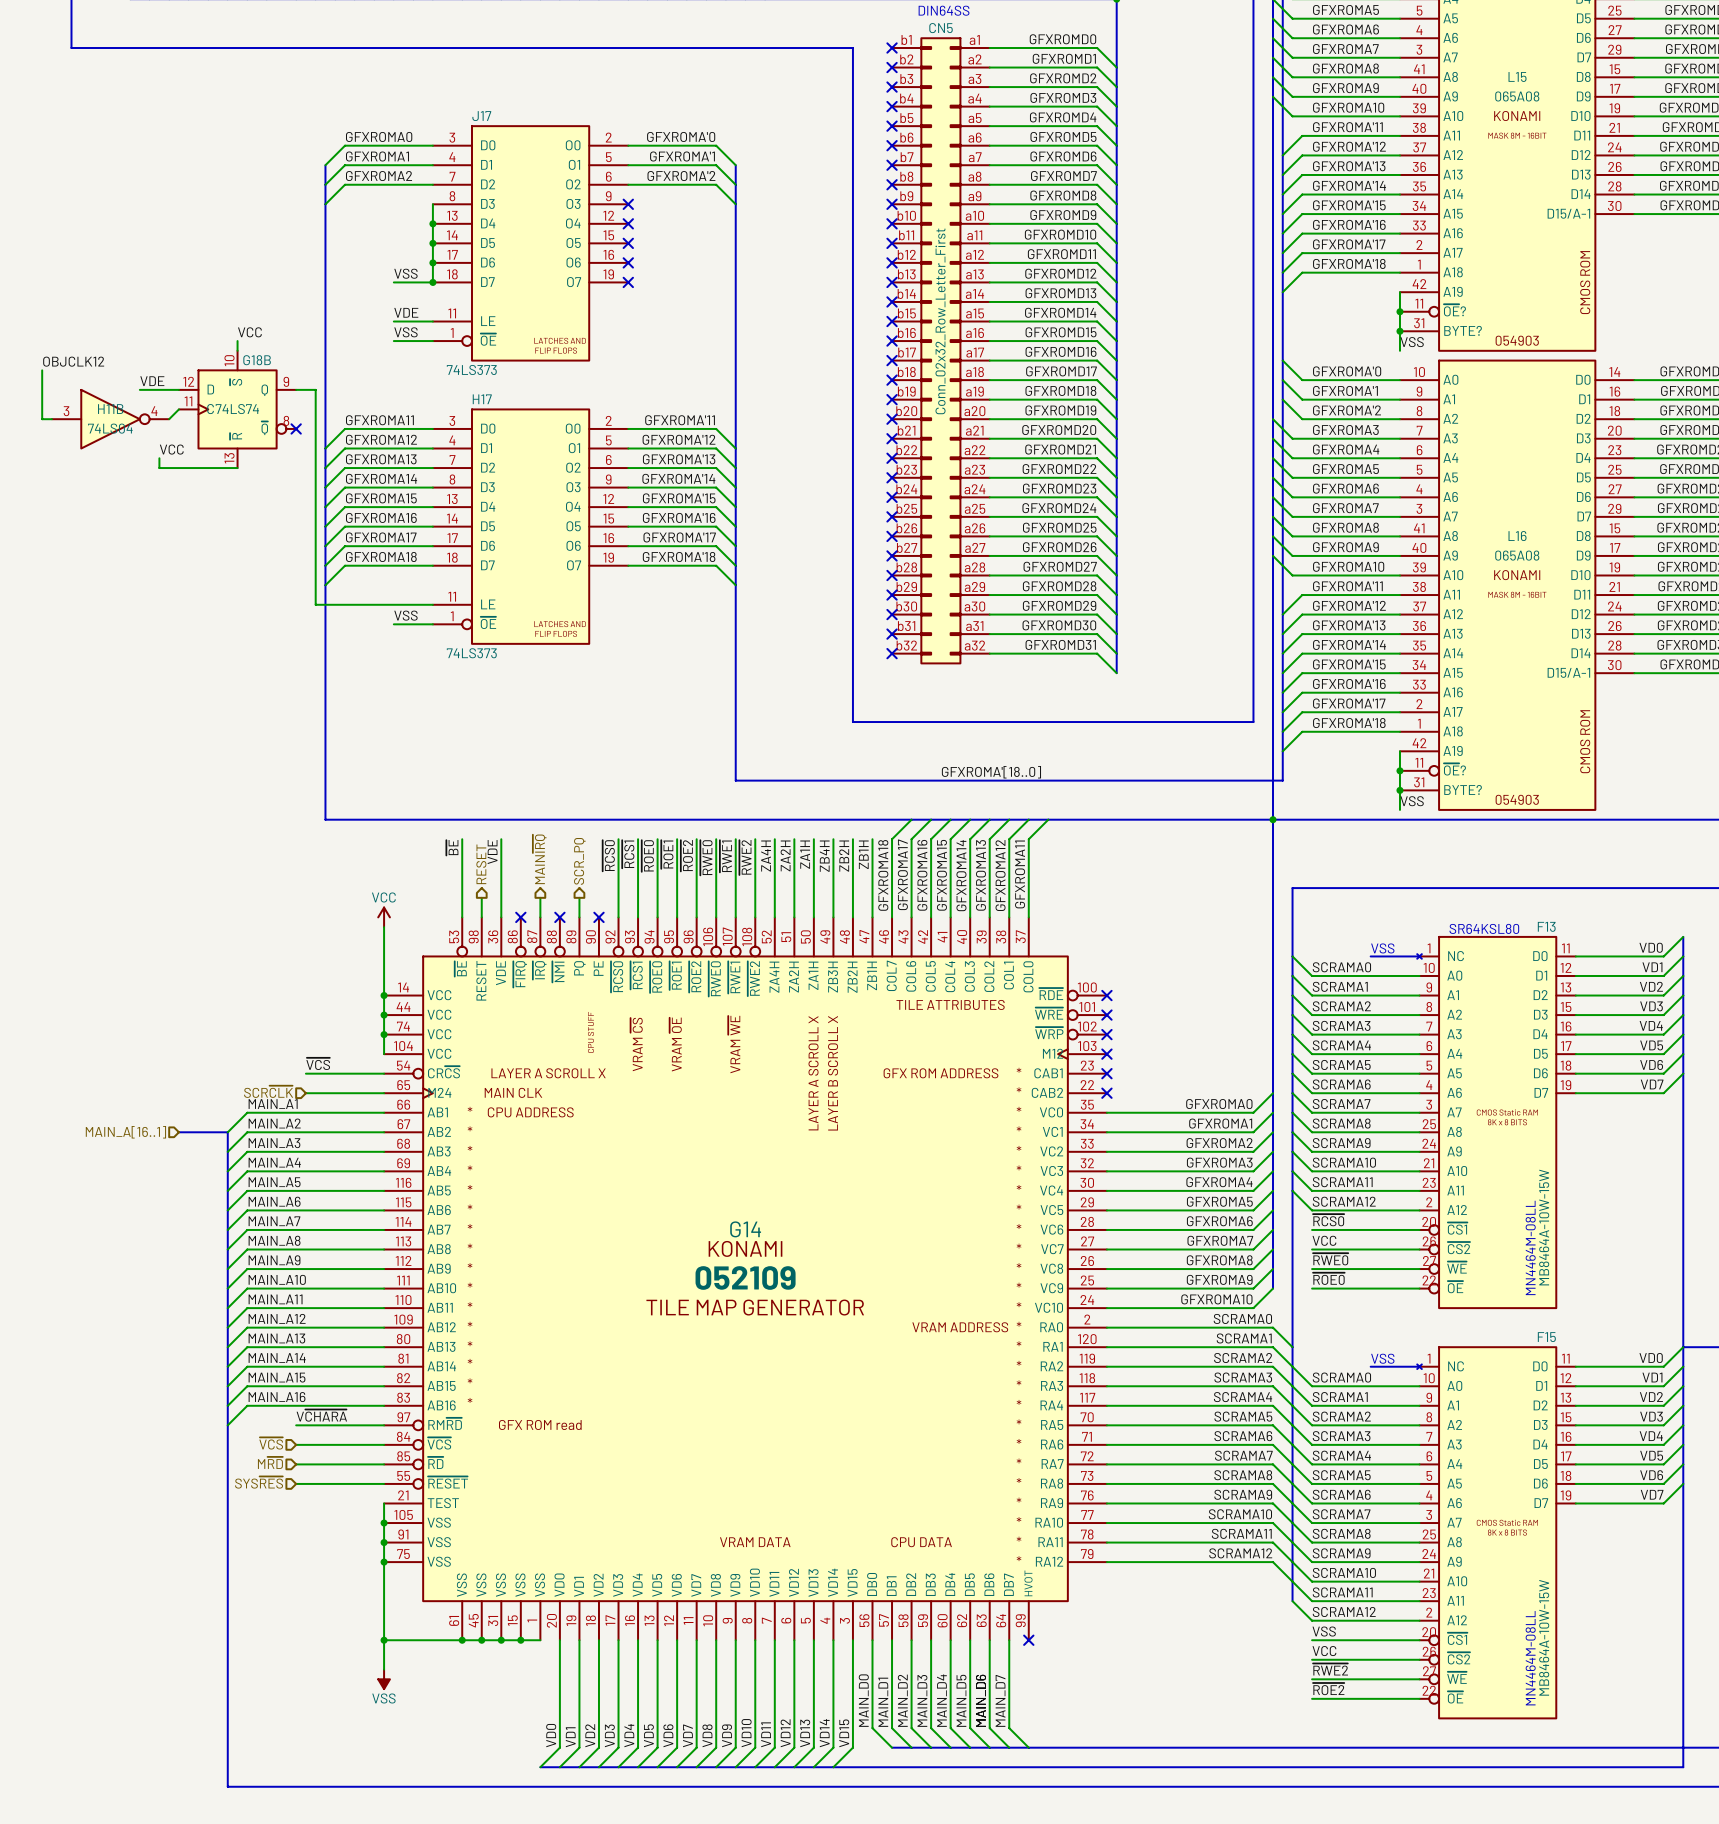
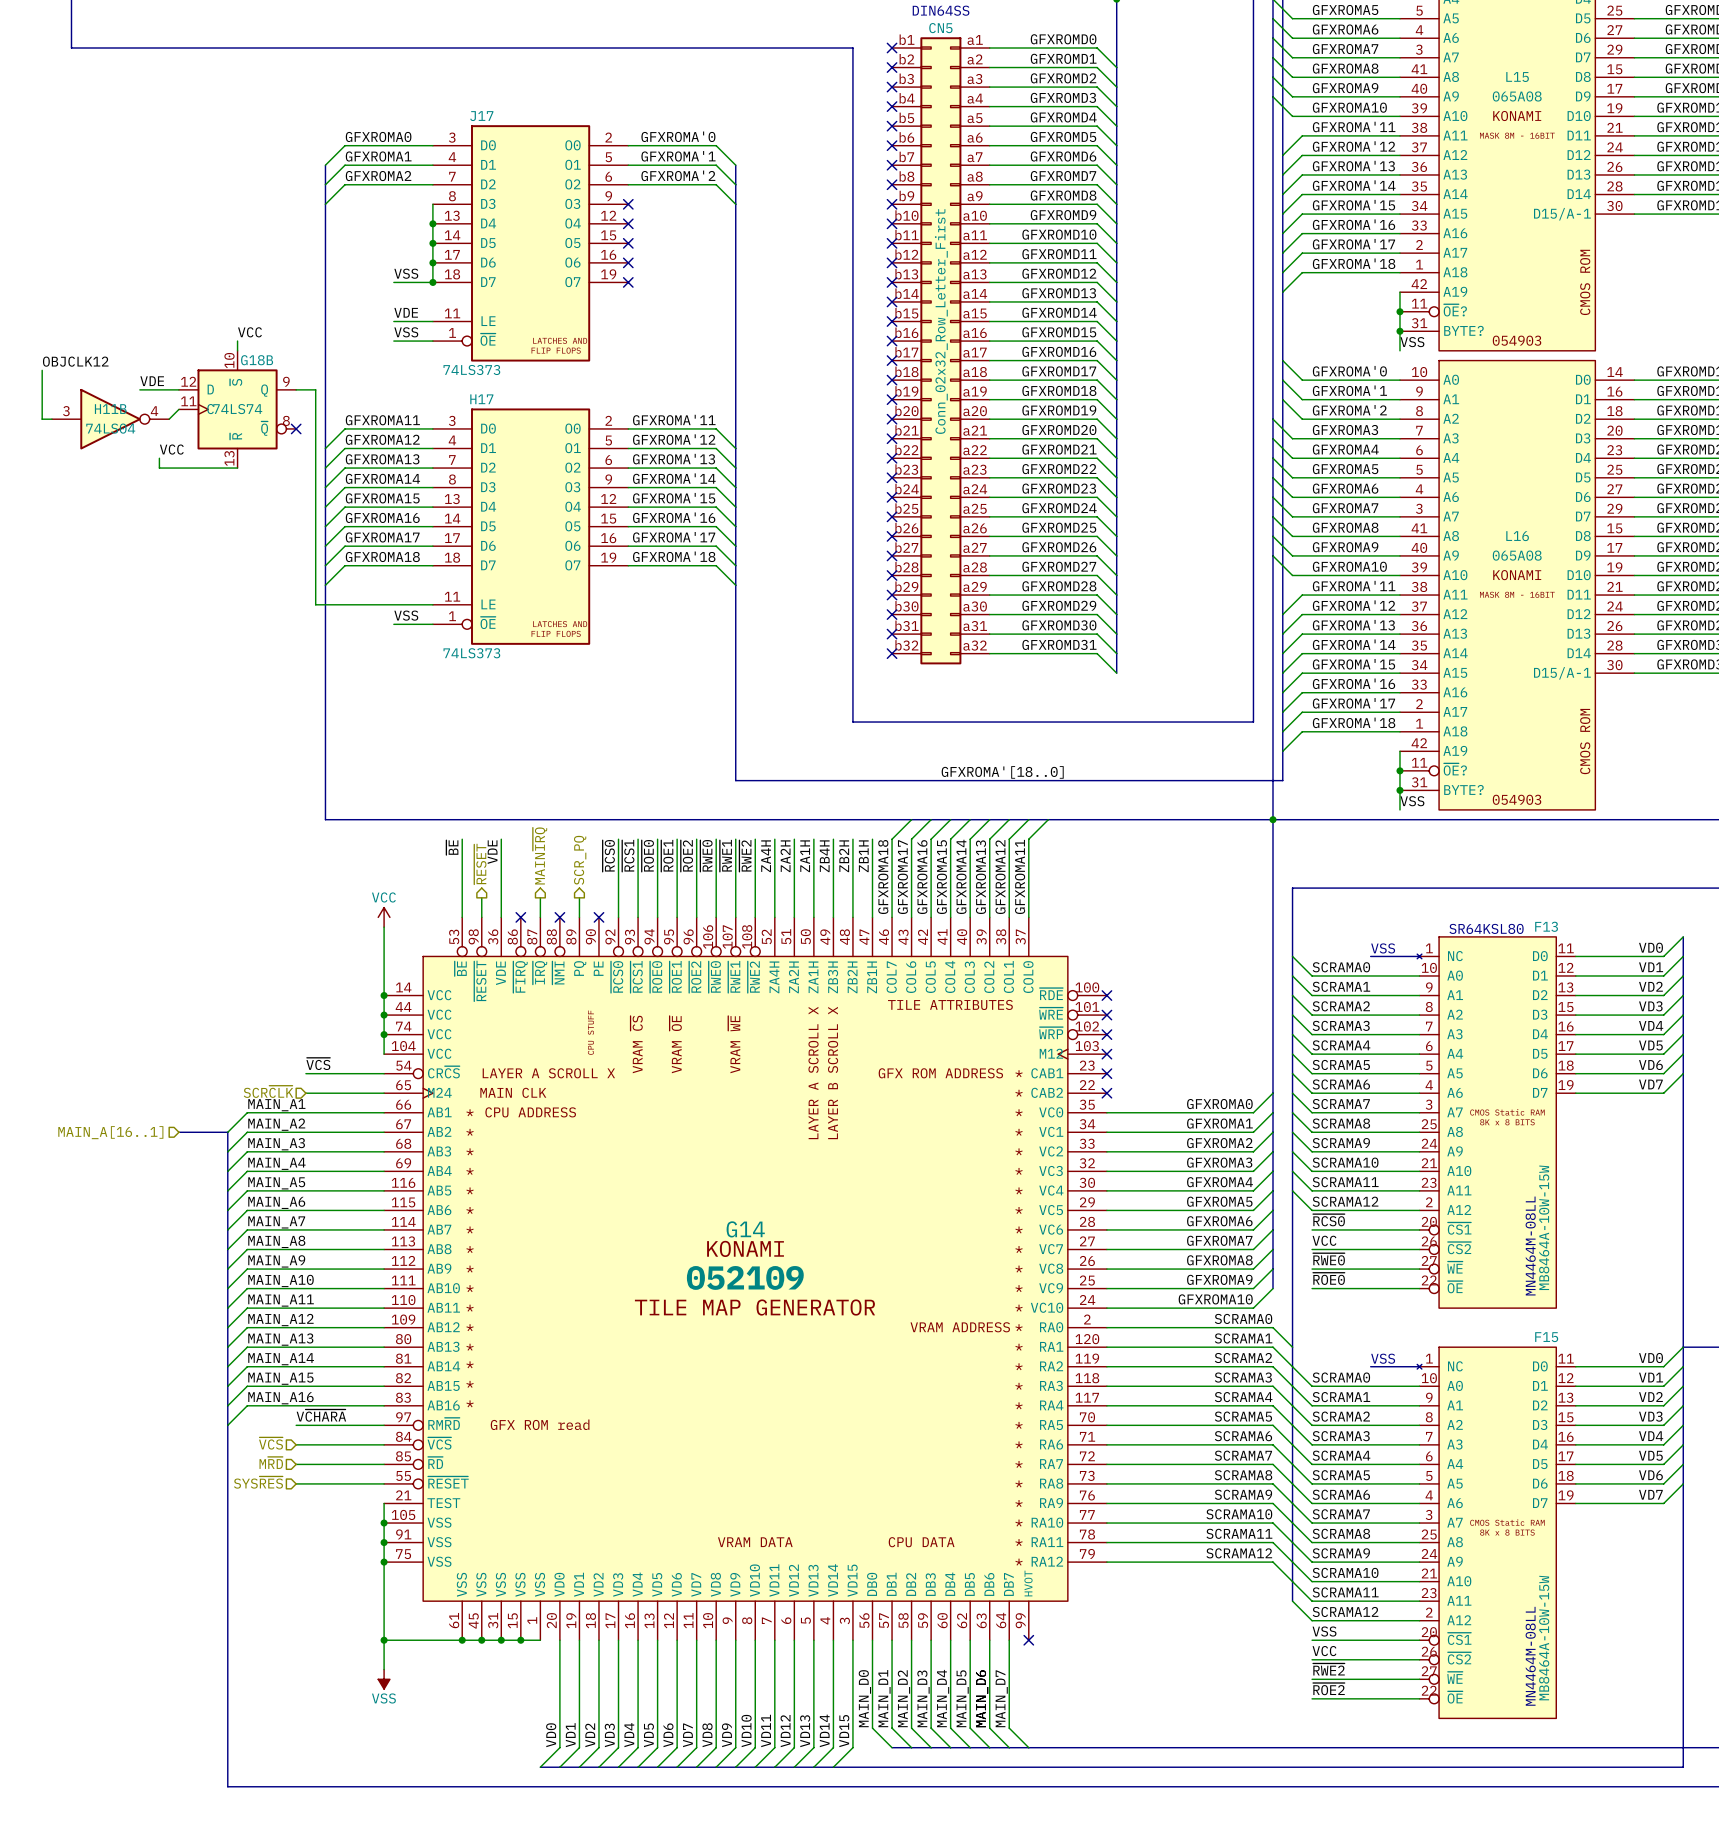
hierarchical label: RESET (481, 864) -> ~{RESET} (480, 864)
G14 symbol: [384, 917, 1107, 1641] -> [384, 917, 1107, 1641]

